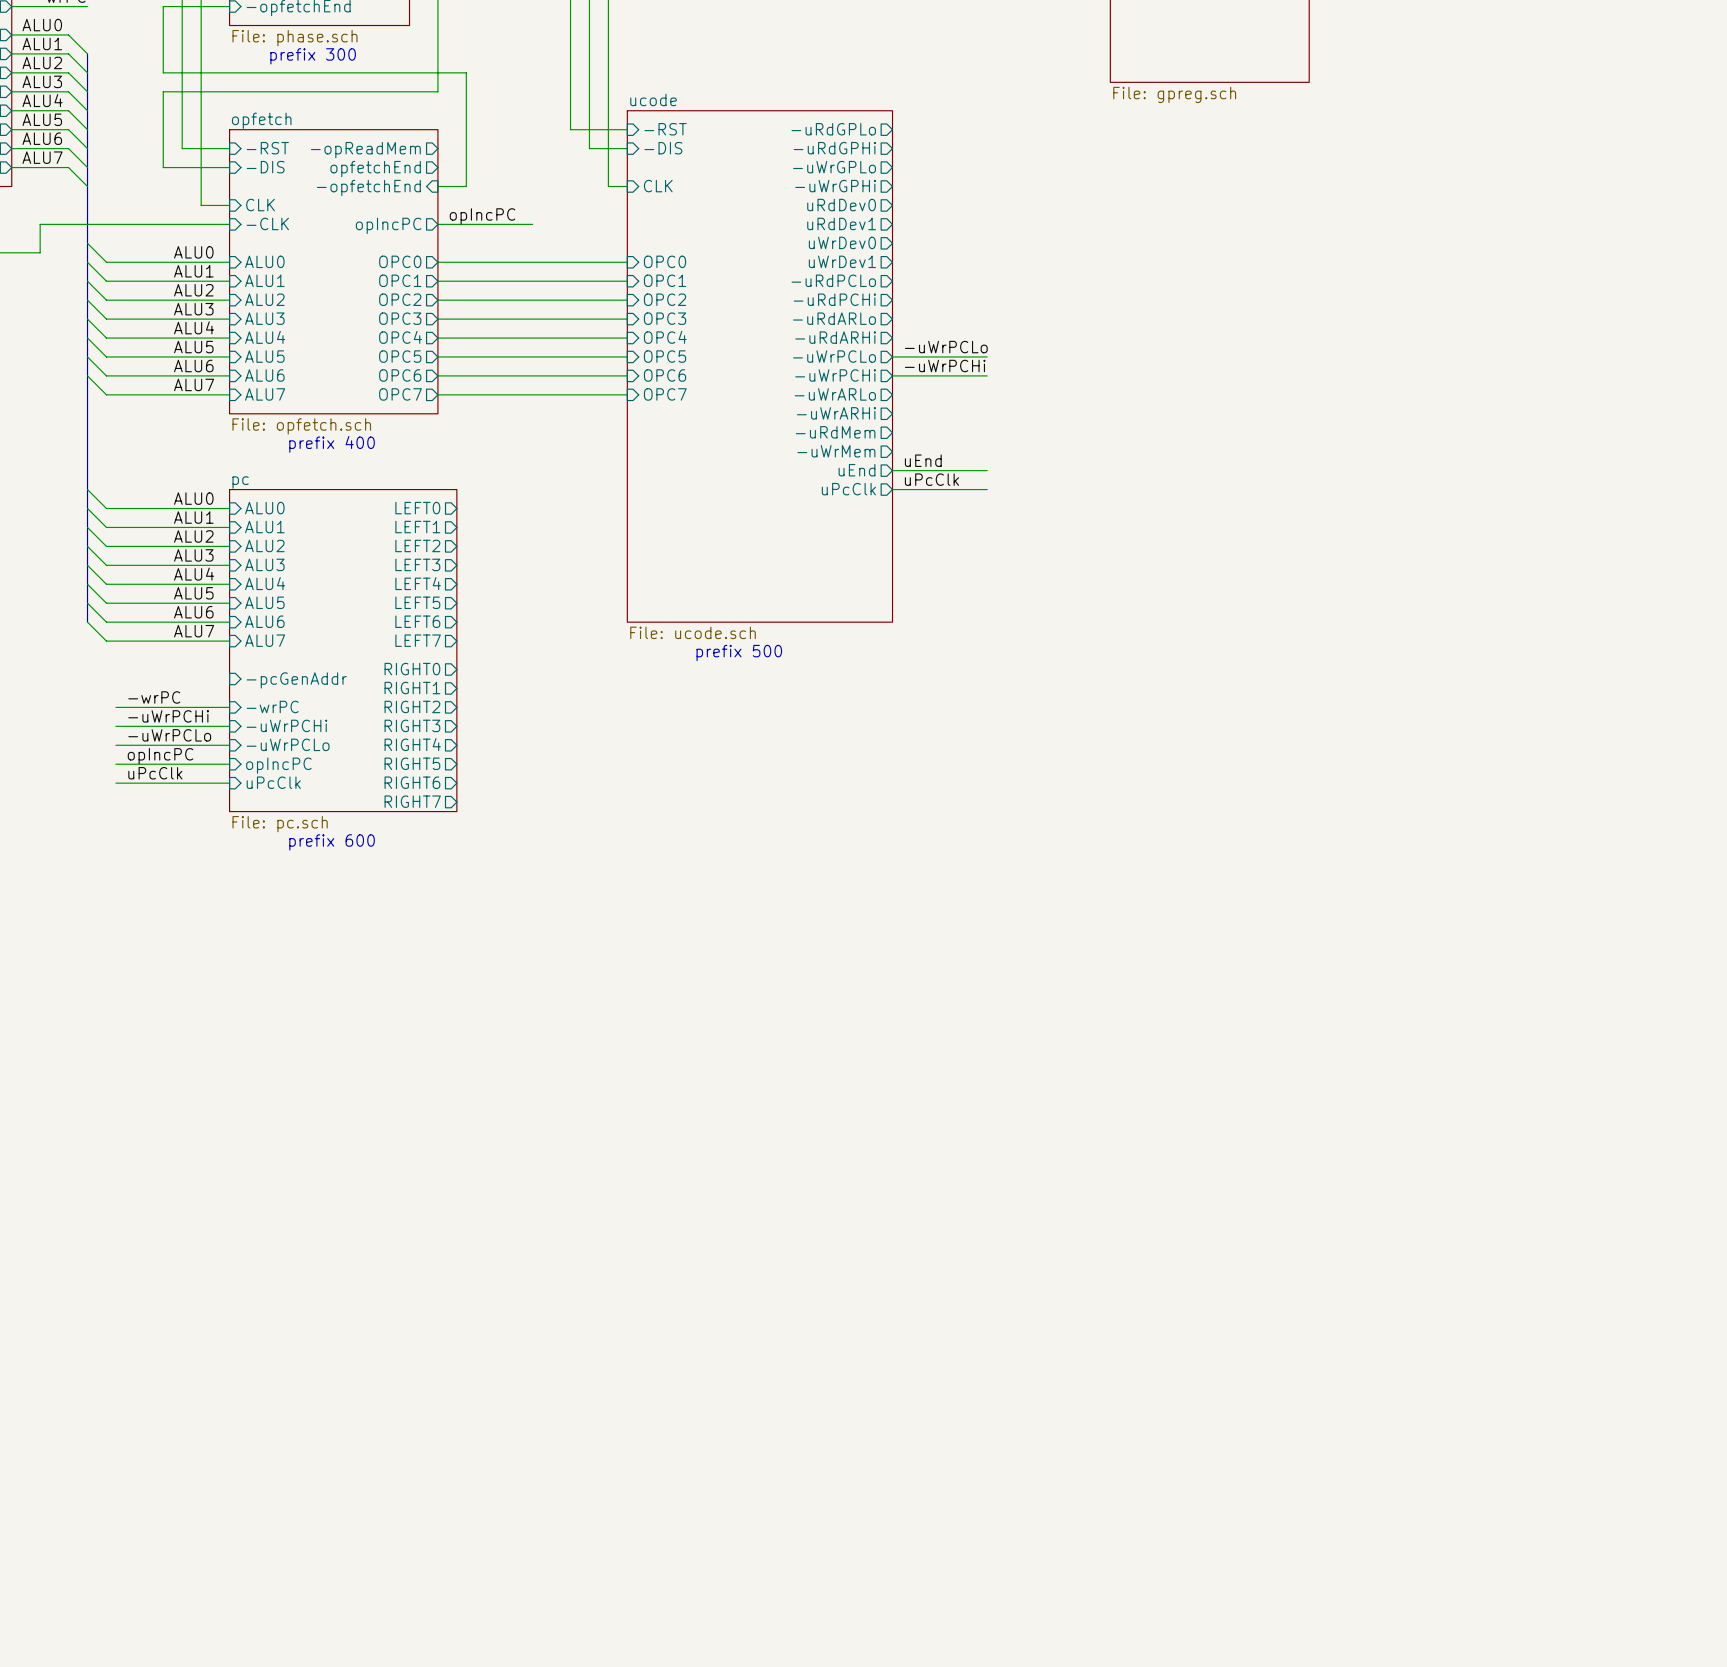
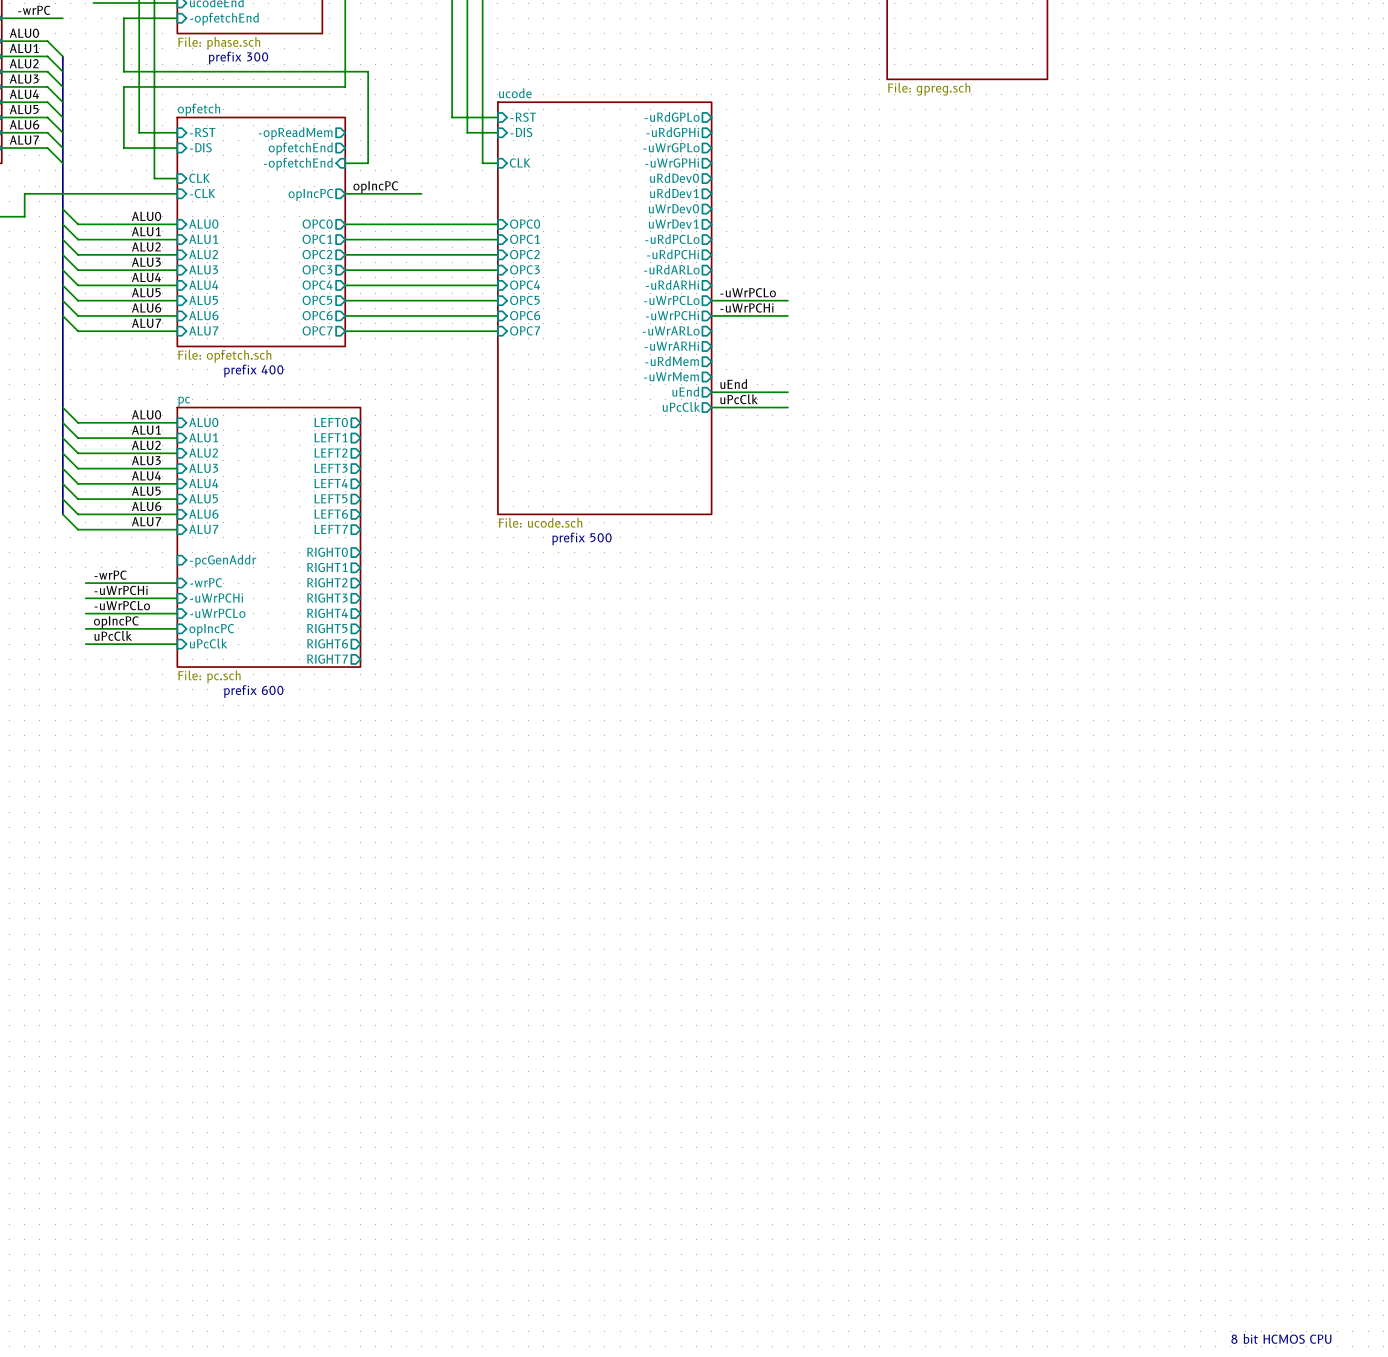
text: none -> 8 bit HCMOS CPU (1281, 1338)

